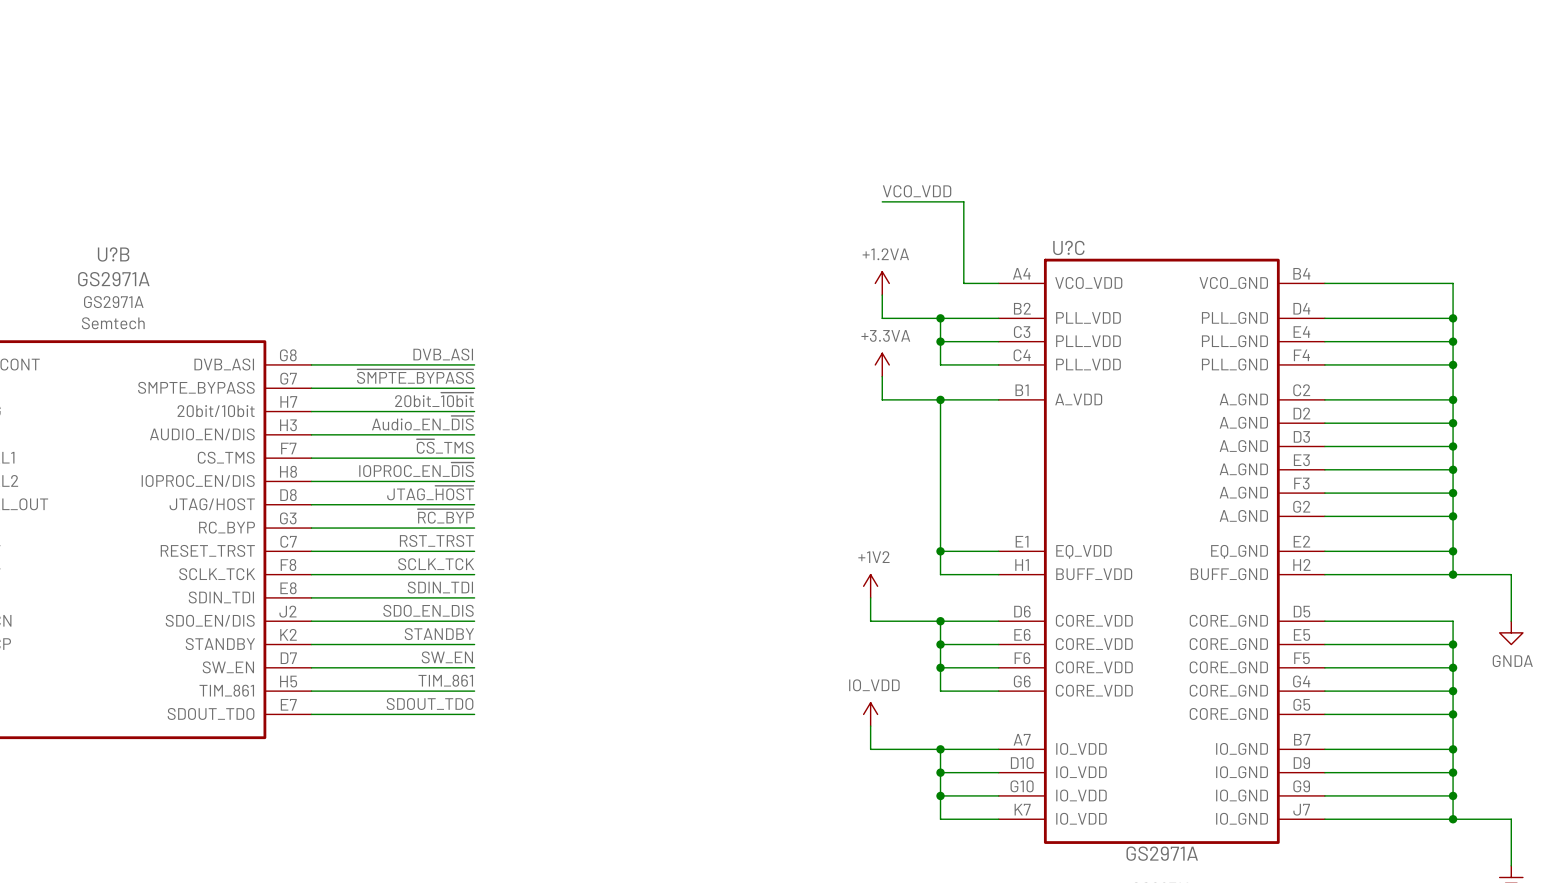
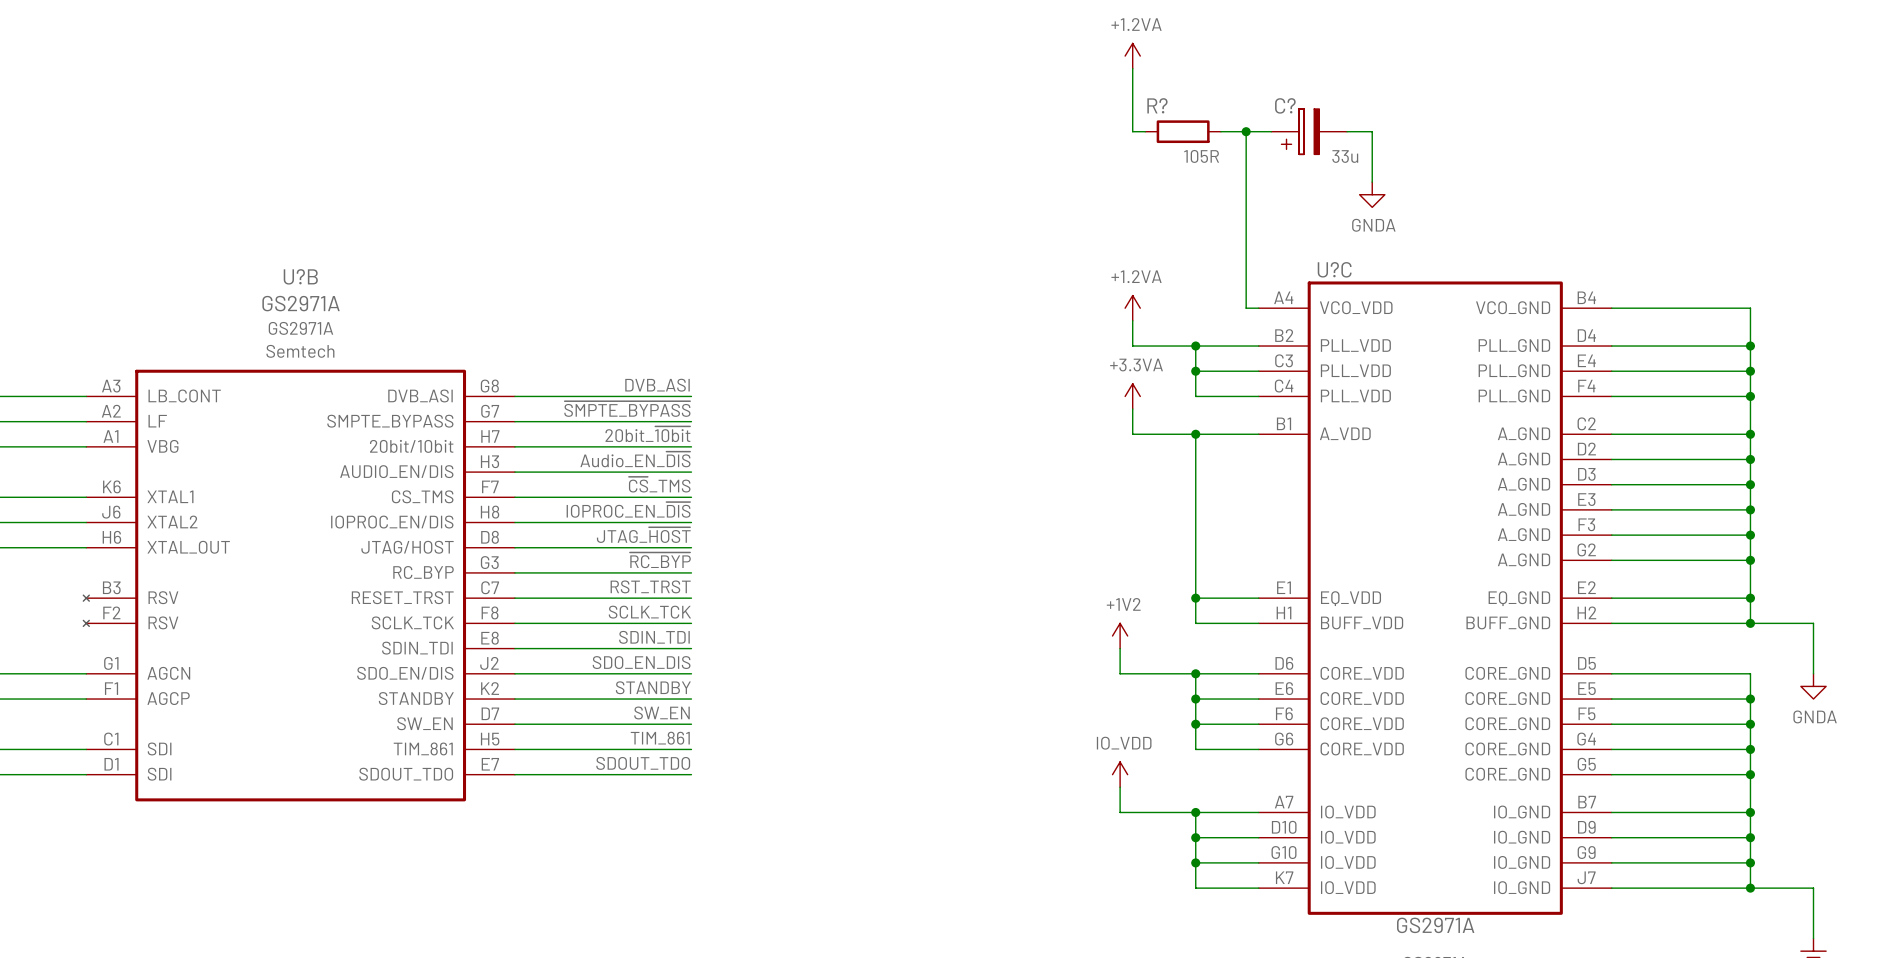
power symbol: none -> (1132, 56)
wire: none -> (1132, 68) (1132, 131) (1145, 131)
R?: none -> (1183, 131)
wire: none -> (1220, 131) (1271, 131)
junction: none -> (1246, 131)
C?: none -> (1309, 131)
wire: none -> (1347, 131) (1372, 131) (1372, 182)
power symbol: none -> GNDA (1372, 194)
label: VCO_VDD (917, 191) -> none
wire: (882, 201) (963, 201) (963, 283) (987, 283) -> (1246, 131) (1246, 308)

